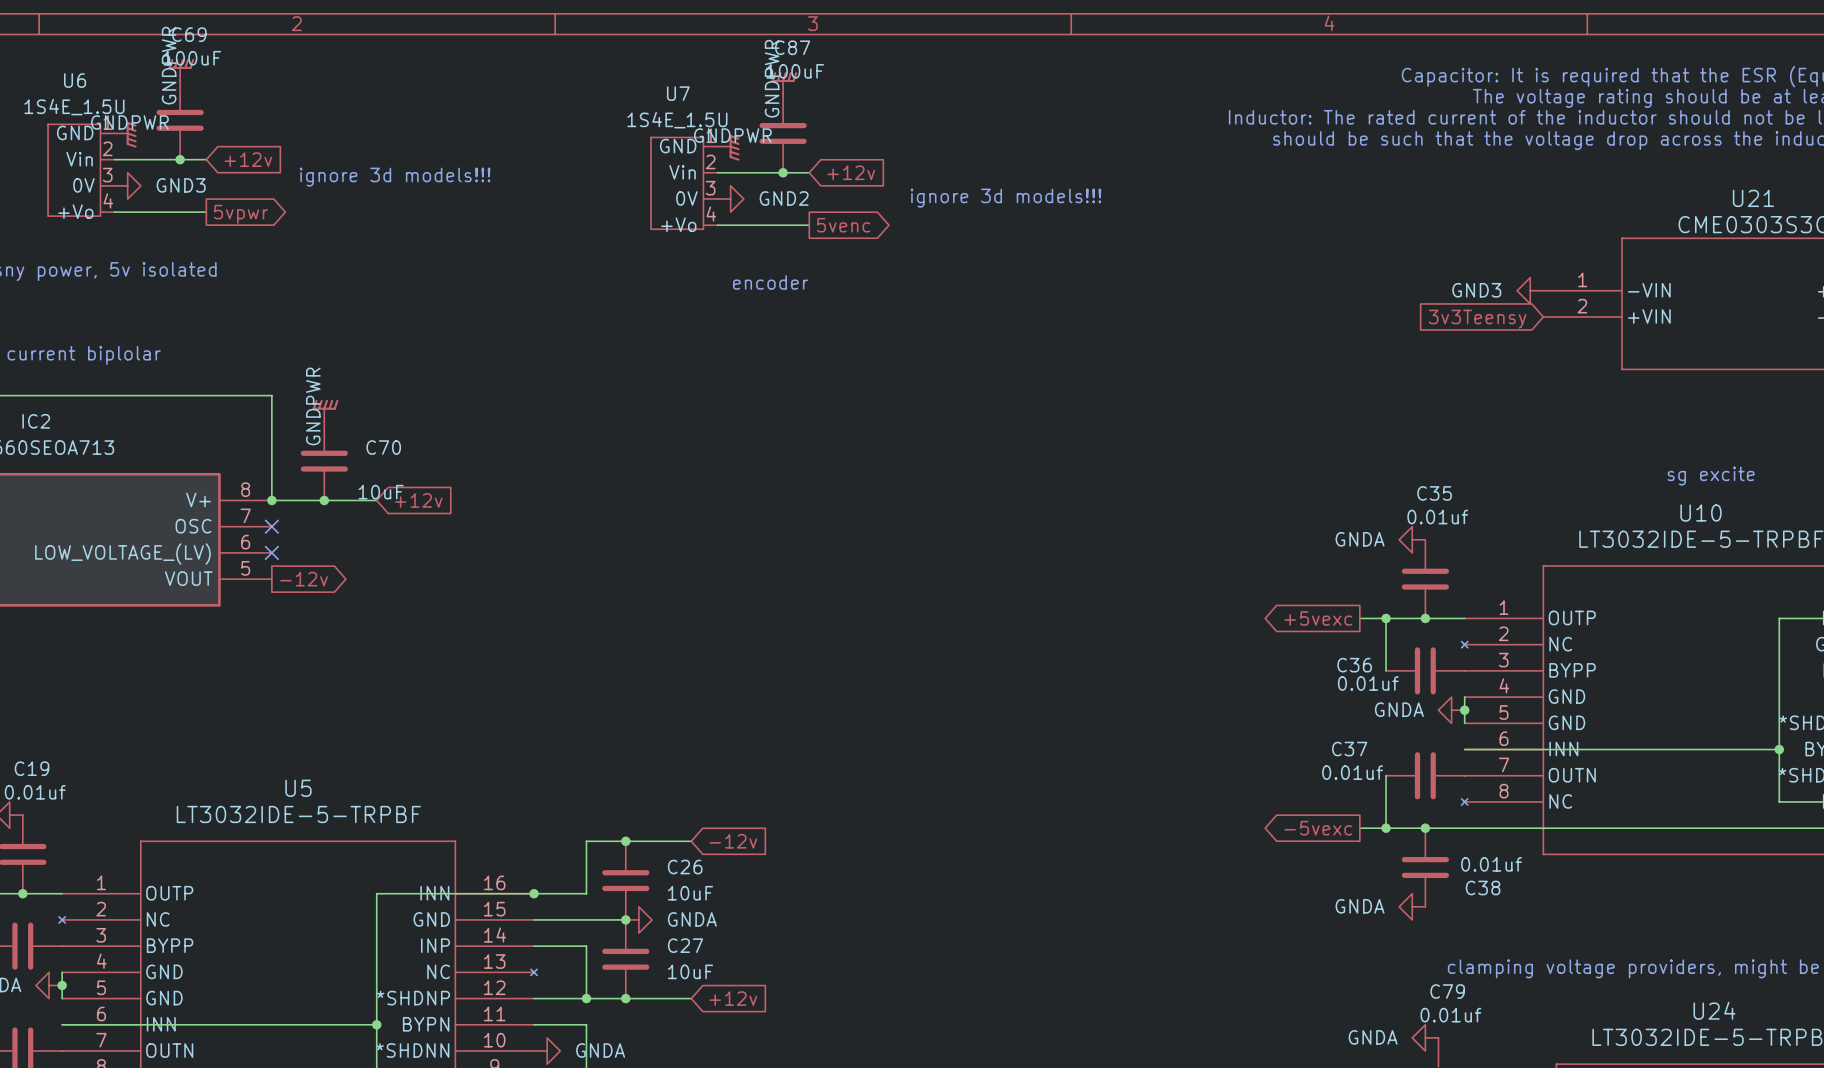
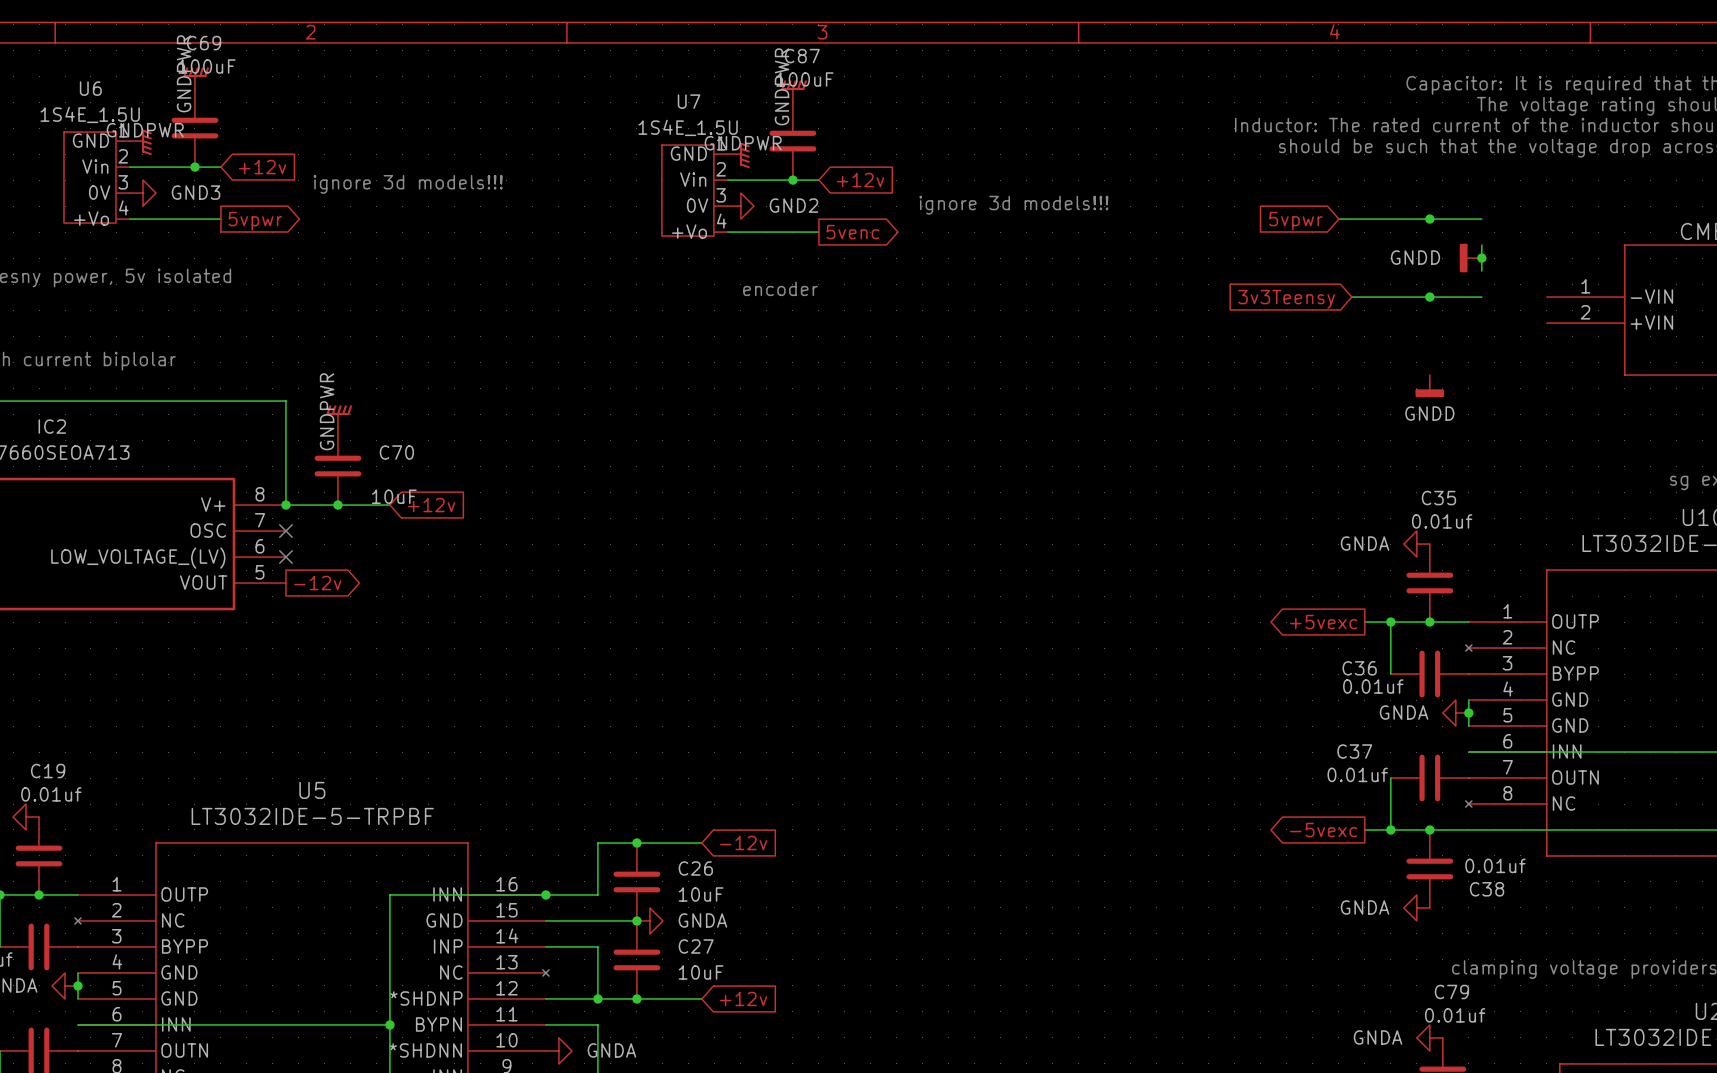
wire: none -> (1338, 219) (1481, 219)
junction: none -> (1429, 219)
global label: none -> 5vpwr (1295, 221)
wire: none -> (1481, 245) (1481, 271)
power symbol: none -> GNDD (1470, 258)
junction: none -> (1481, 258)
wire: none -> (1351, 297) (1481, 297)
junction: none -> (1429, 297)
power symbol: GND3 (1530, 290) -> none
global label position: 3v3Teensy (1477, 319) -> 3v3Teensy (1286, 299)
power symbol: none -> GNDD (1429, 386)

